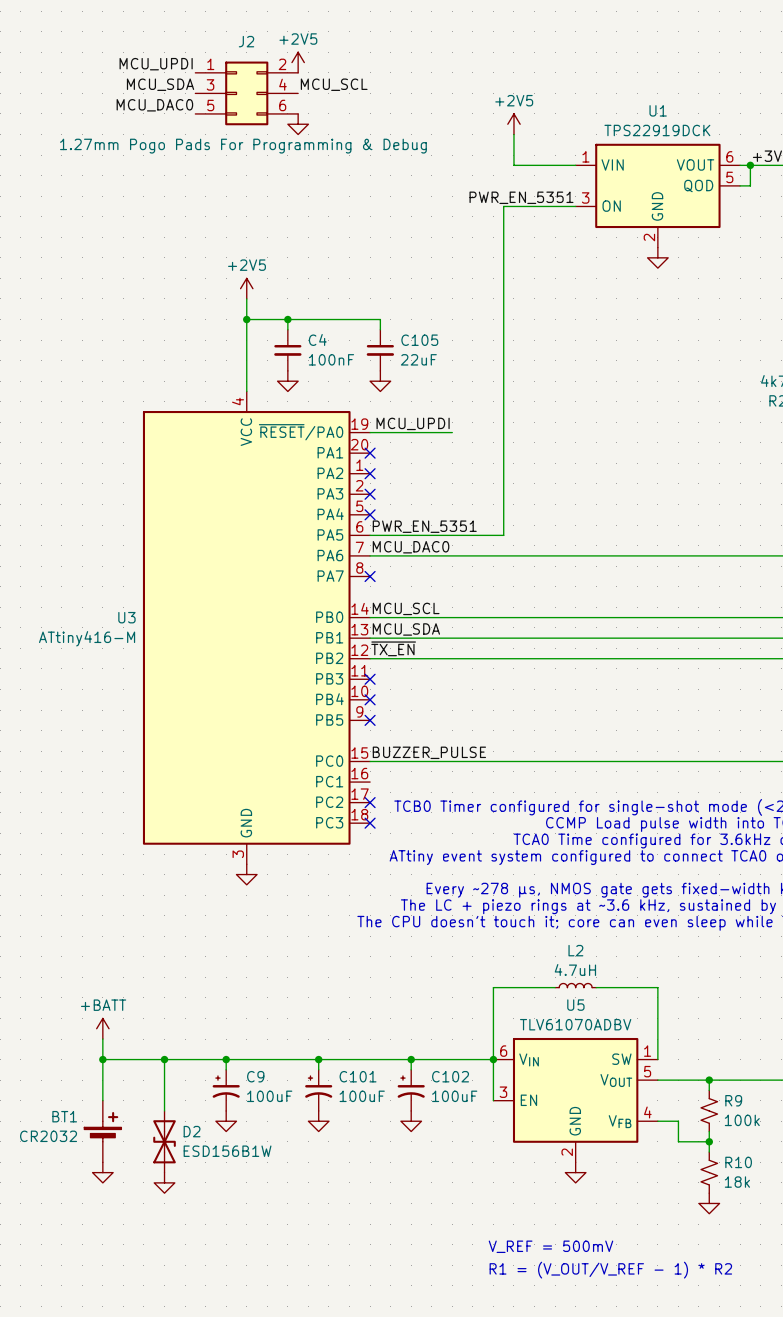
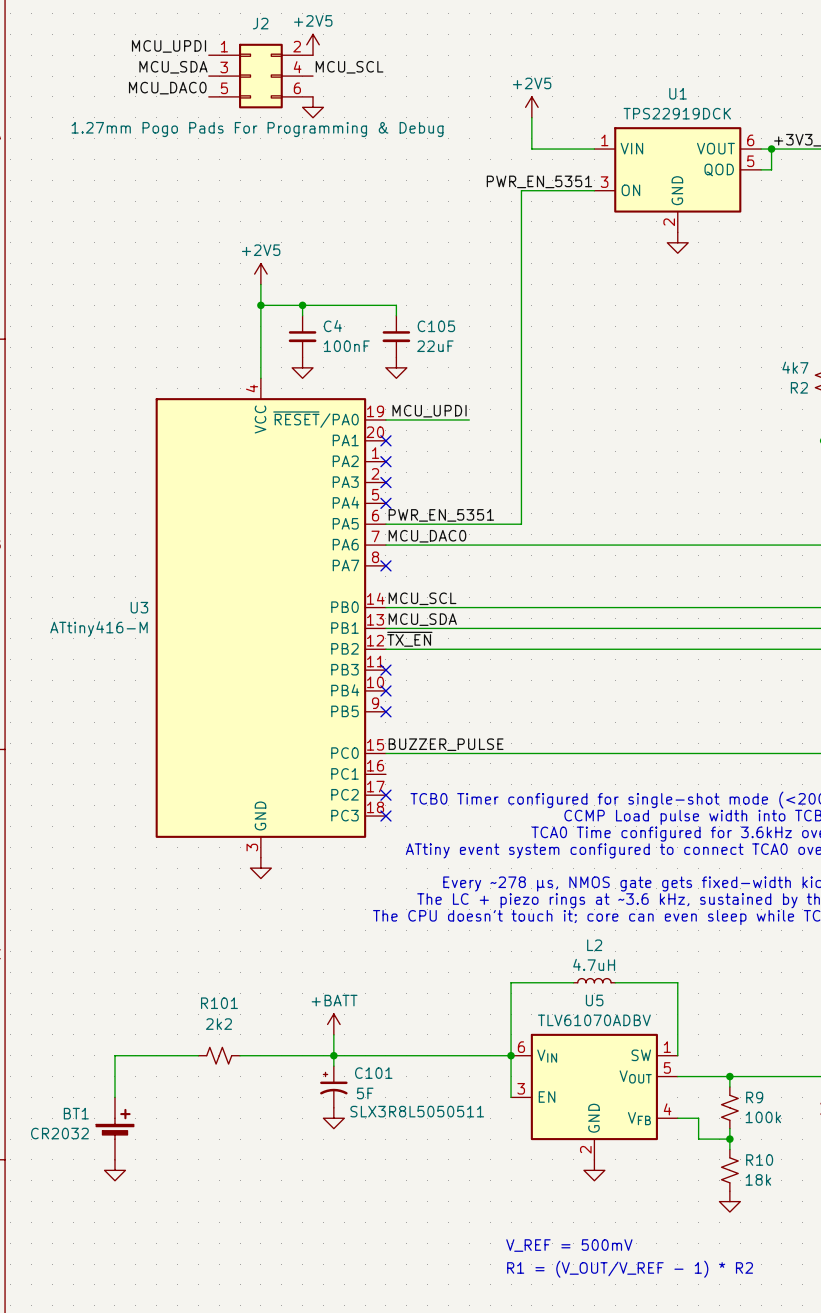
power symbol: +BATT (102, 1028) -> none
power symbol: none -> +BATT (333, 1024)
wire: (102, 1039) (102, 1059) -> none
wire: none -> (333, 1034) (333, 1055)
junction: (102, 1059) -> none
wire: (164, 1059) (164, 1110) -> none
junction: (164, 1059) -> none
wire: (185, 1059) (226, 1059) (226, 1069) -> none
R101: none -> 2k2 (219, 1055)
junction: (226, 1059) -> none
wire: (411, 1059) (411, 1069) -> none
junction: (411, 1059) -> none
C9: 100uF (226, 1090) -> none
C102: 100uF (411, 1090) -> none
C101 value: 100uF (362, 1096) -> 5F (365, 1093)
C101 text: none -> SLX3R8L5050511 (417, 1111)
power symbol: (226, 1121) -> none
power symbol: (411, 1121) -> none
D2: ESD156B1W (164, 1141) -> none
power symbol: (164, 1182) -> none

